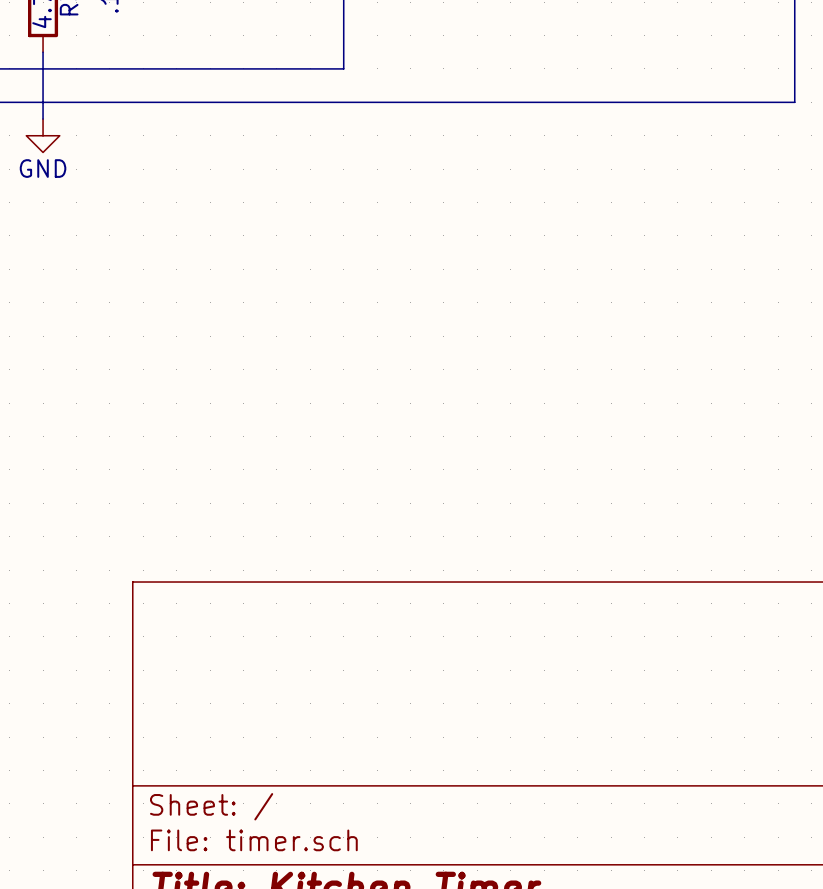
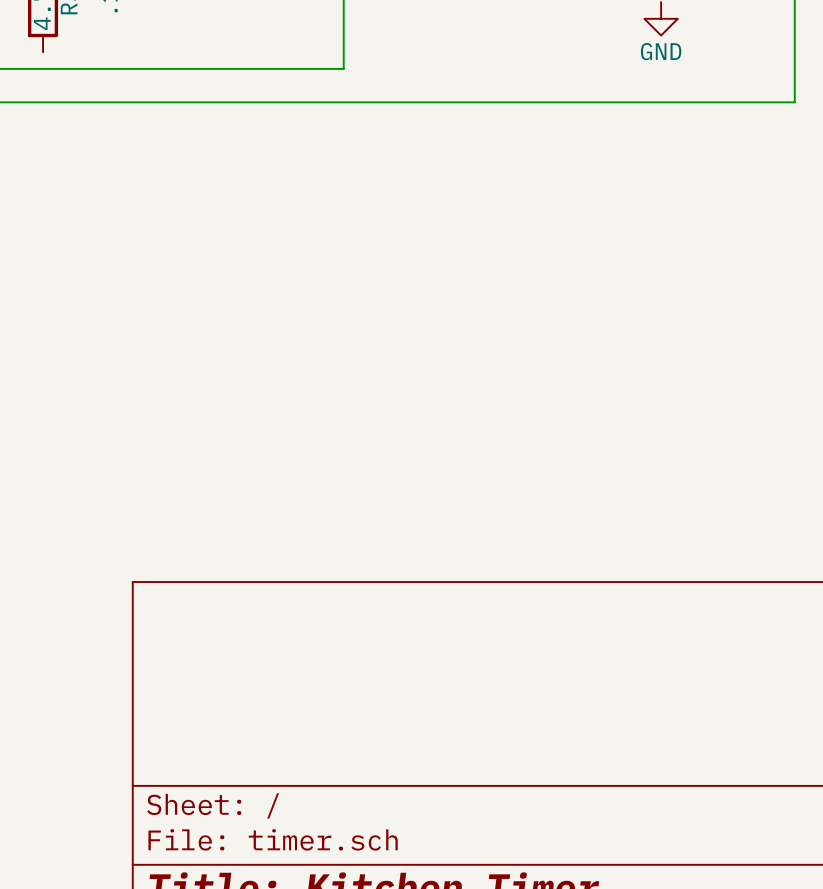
power symbol: none -> GND (661, 18)
wire: (43, 52) (43, 119) -> none
power symbol: GND (43, 135) -> none

